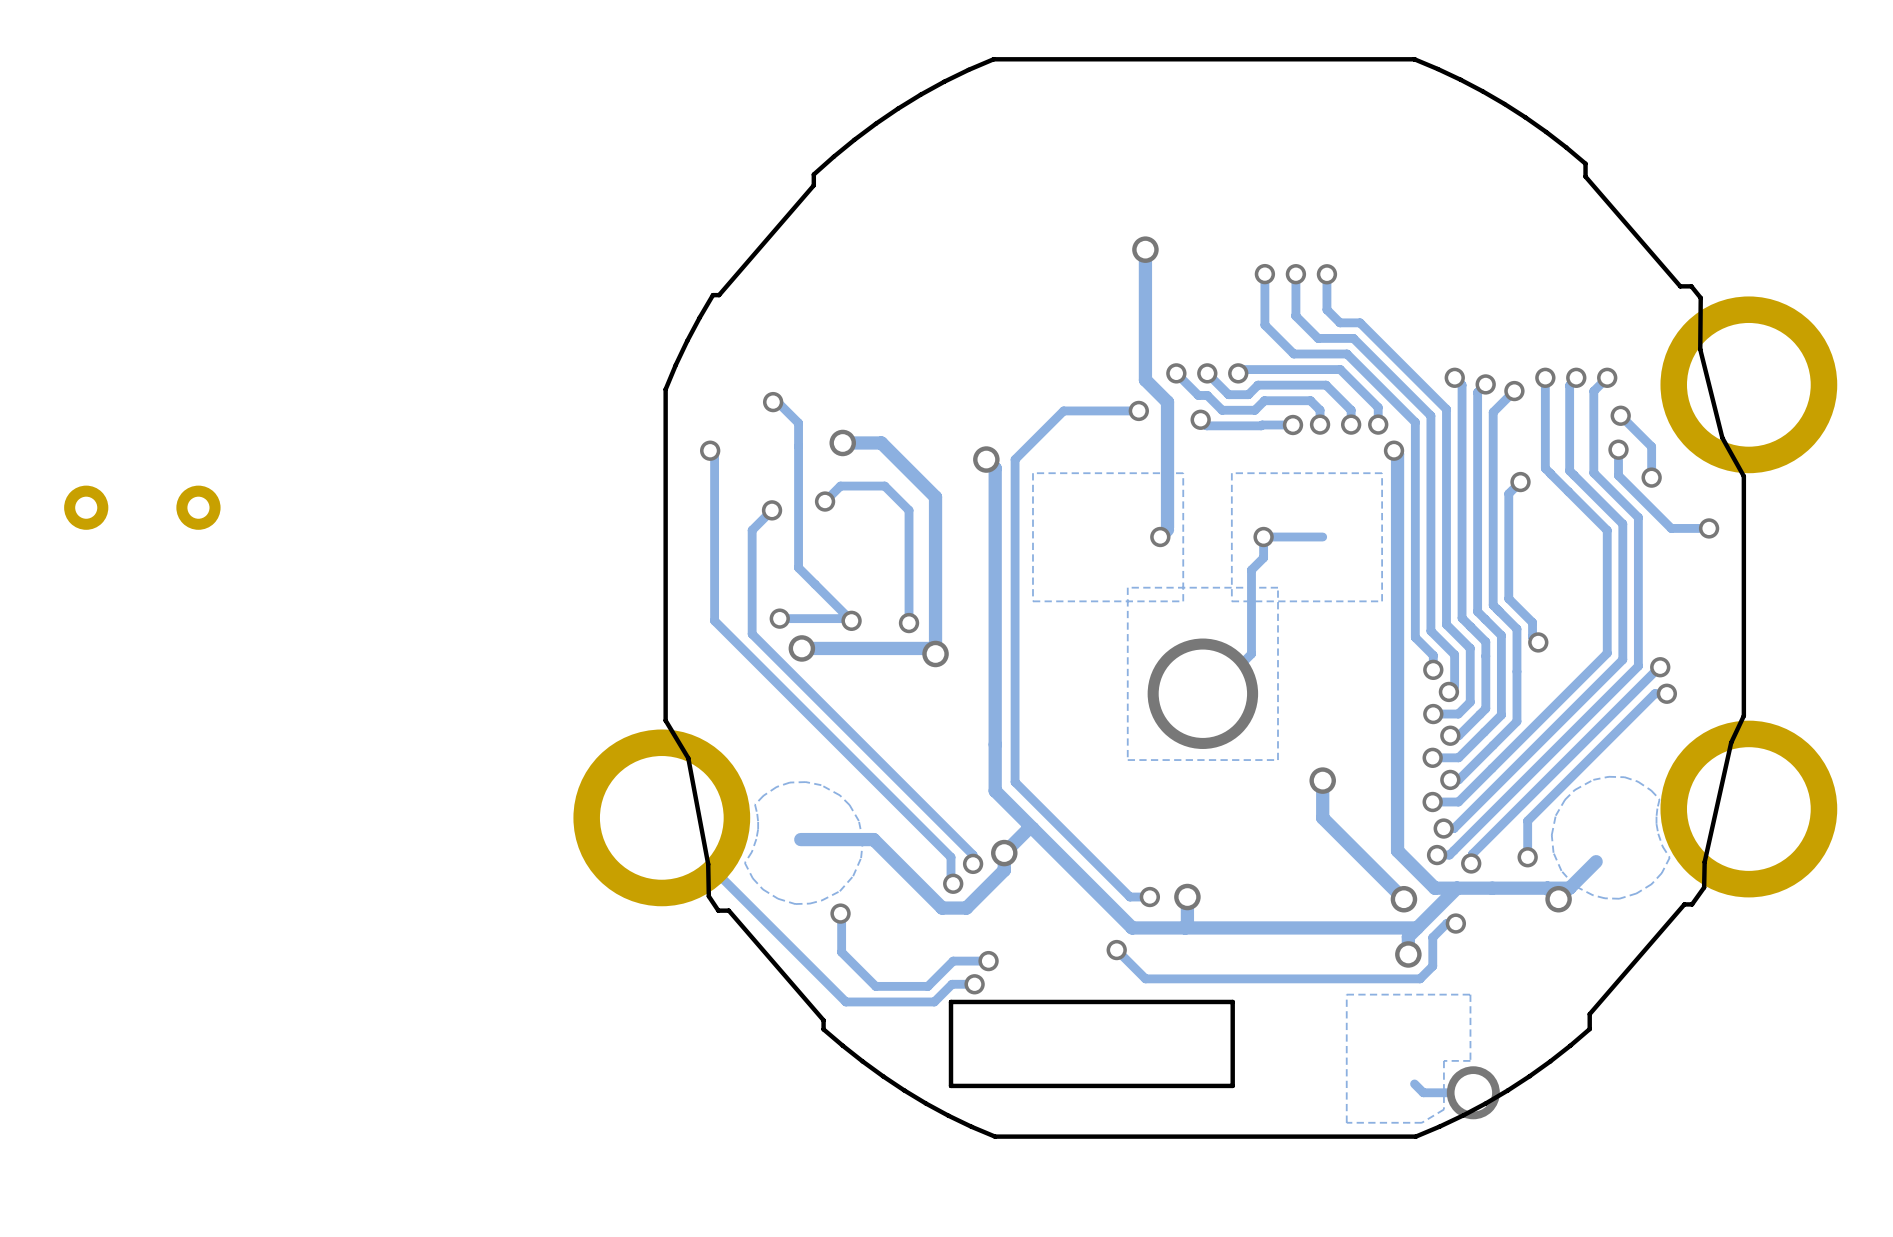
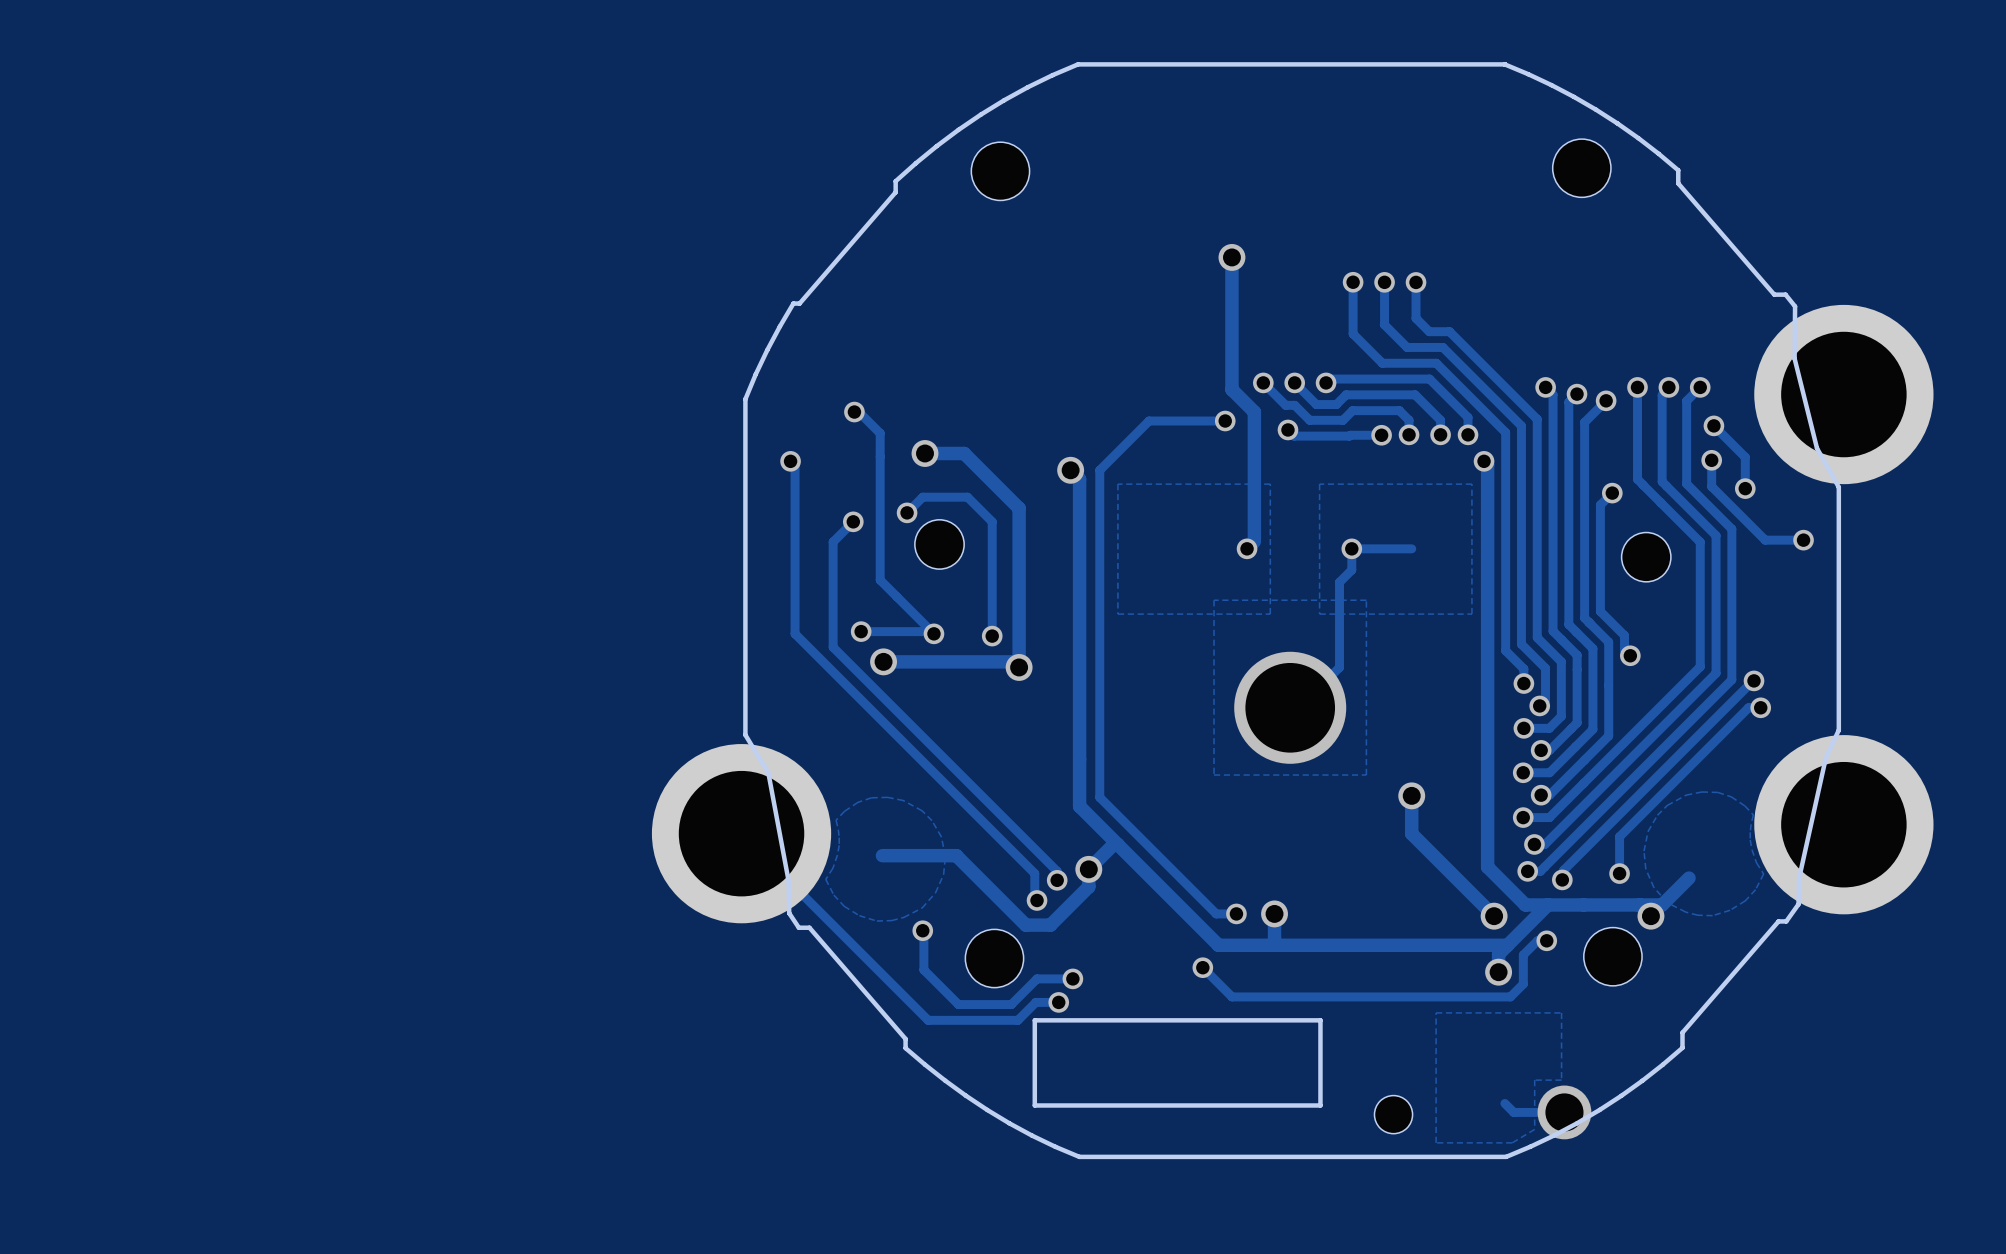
part: none -> (1581, 168)
part: none -> (1000, 171)
part: (142, 507) -> none
part: none -> (939, 544)
part: none -> (1646, 557)
part: none -> (1612, 956)
part: none -> (994, 958)
part: none -> (1393, 1114)

